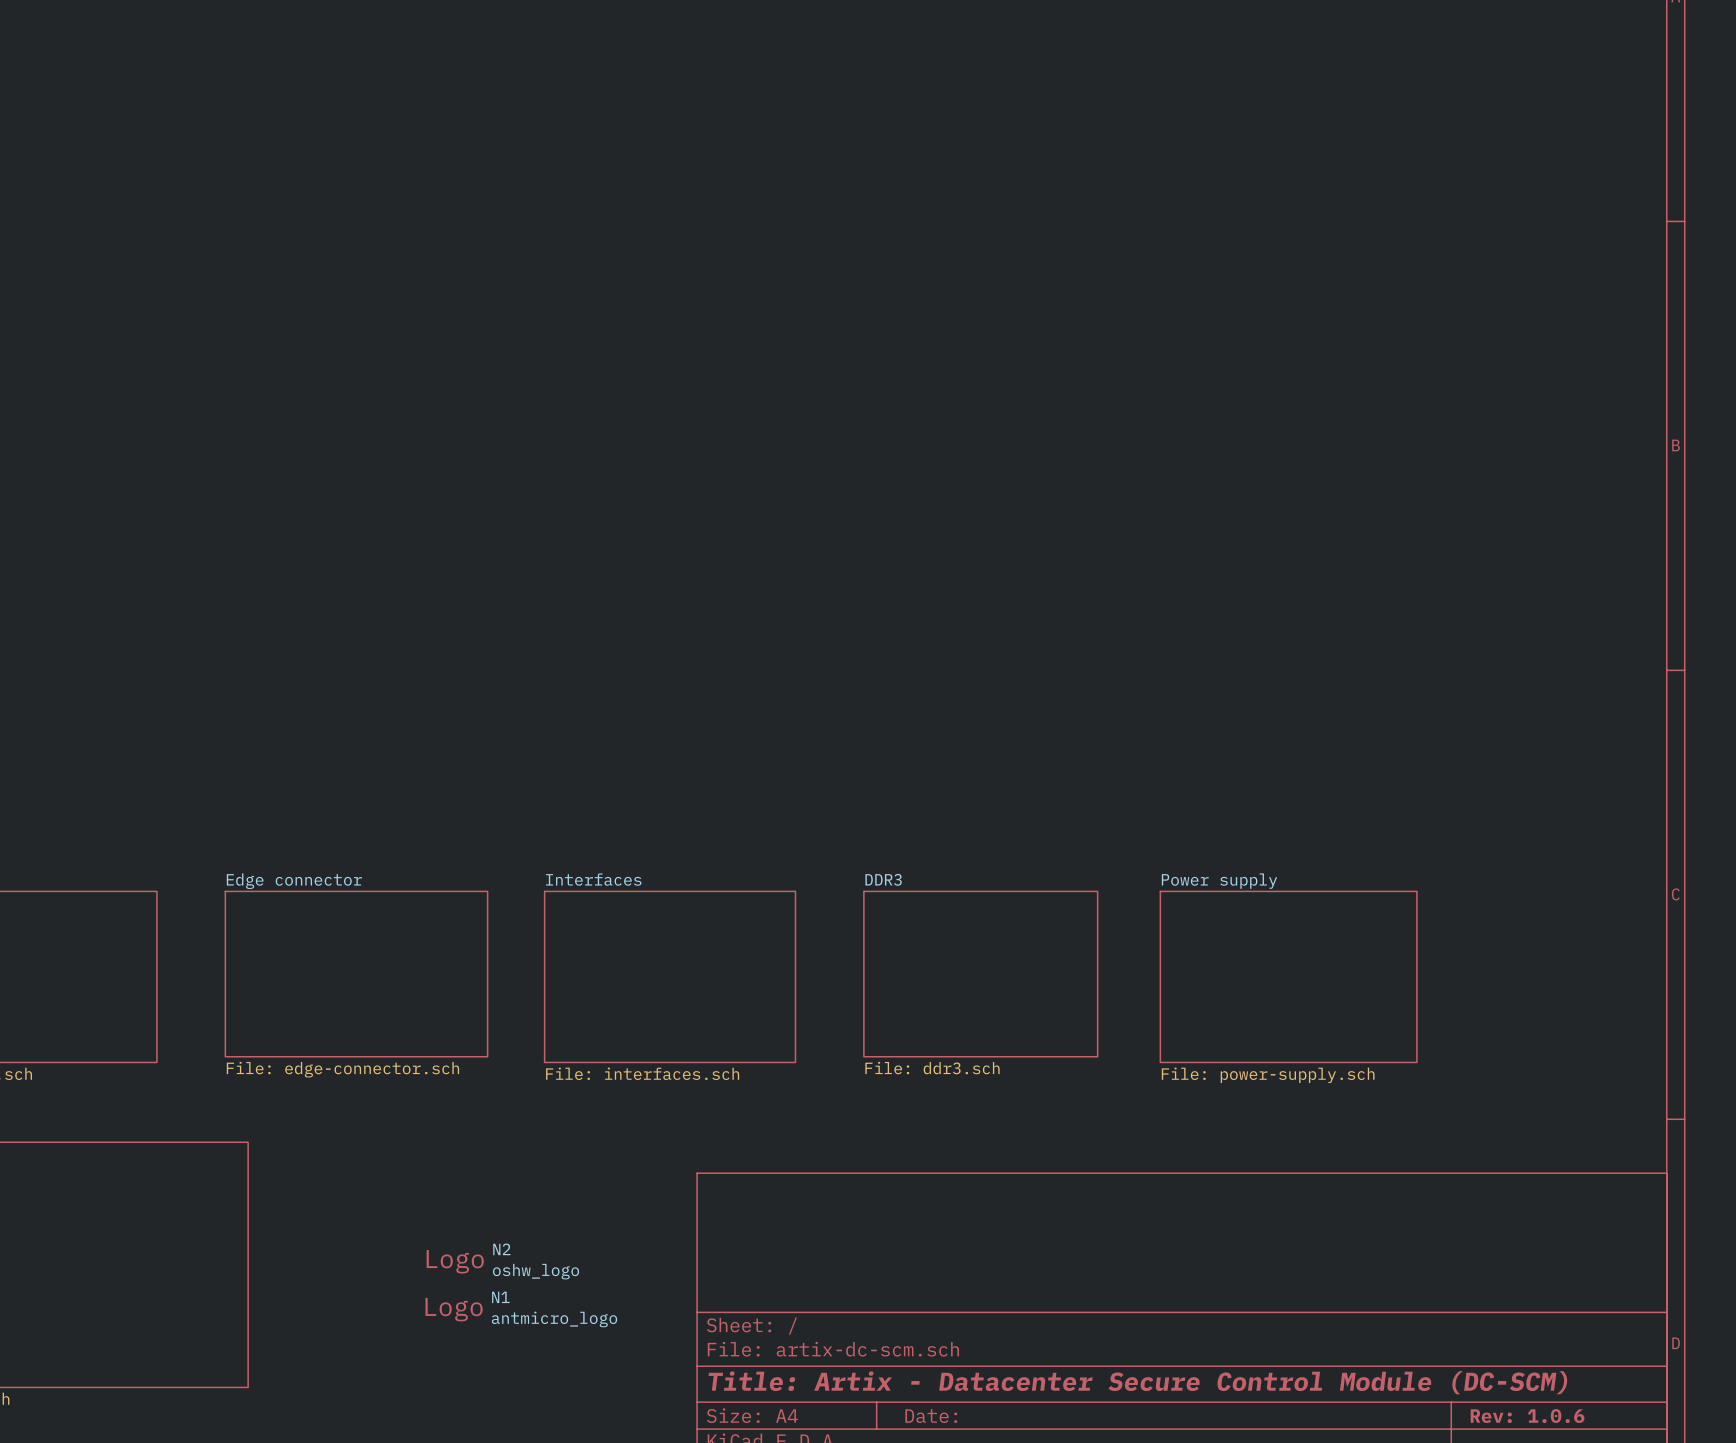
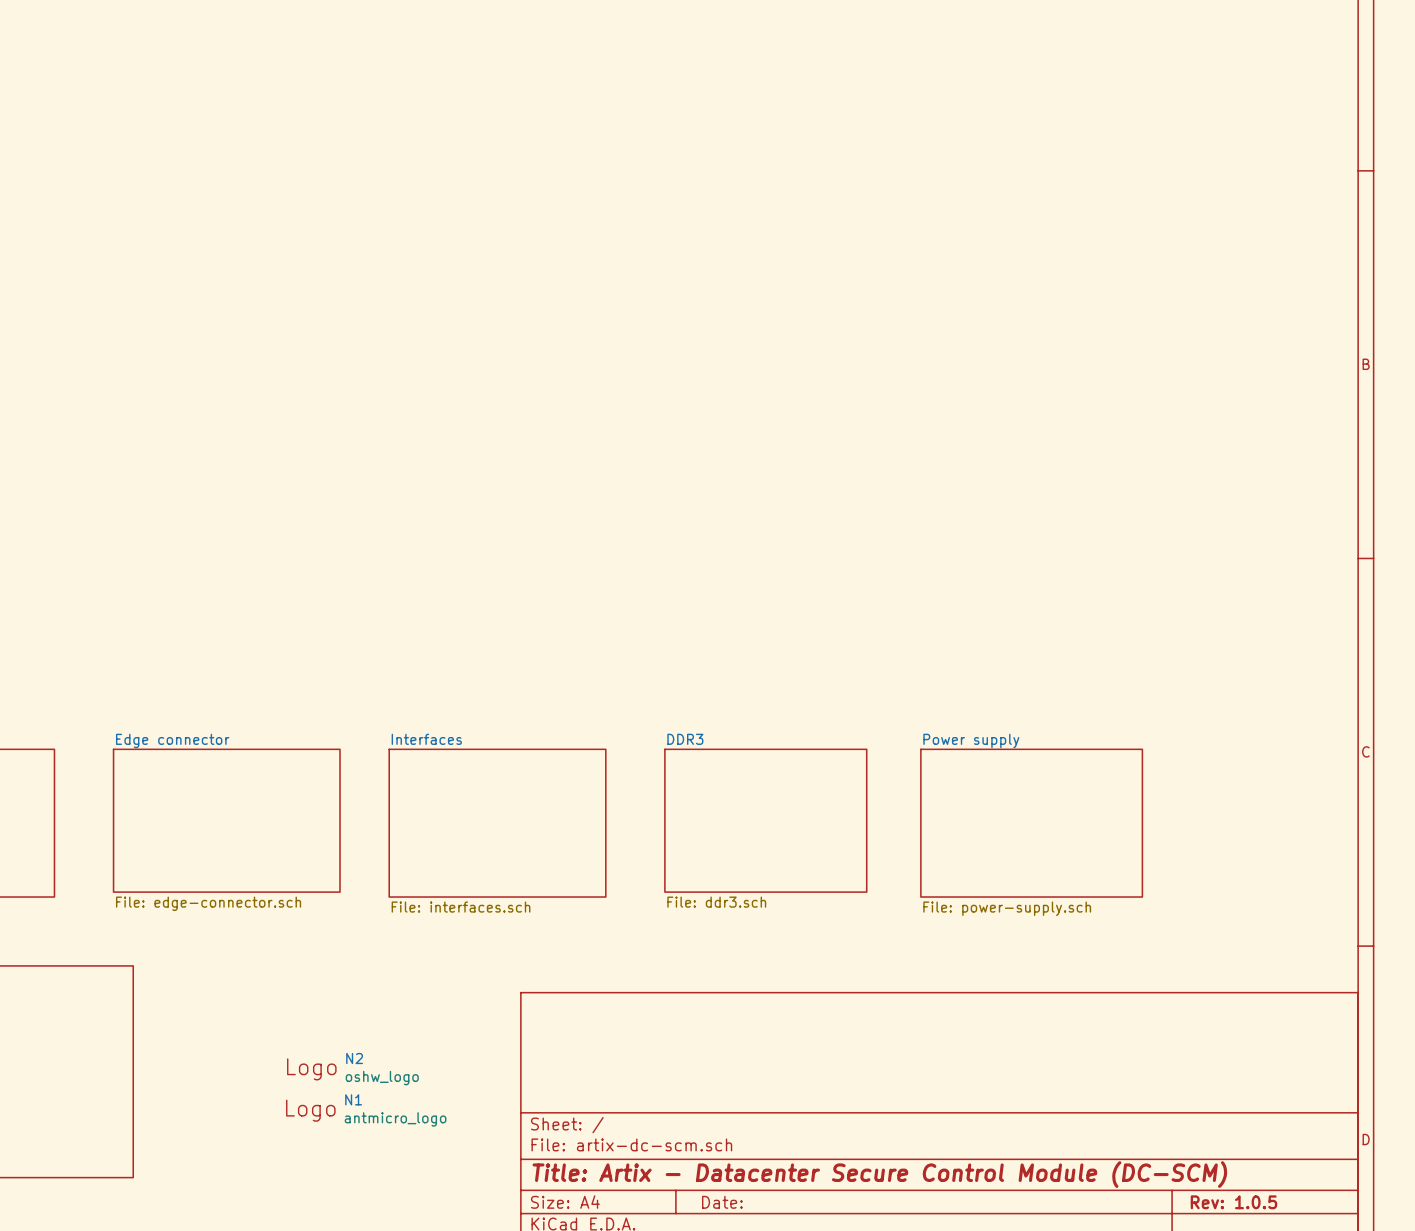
title block: Rev: 1.0.6 (1527, 1416) -> Rev: 1.0.5 (1233, 1202)

